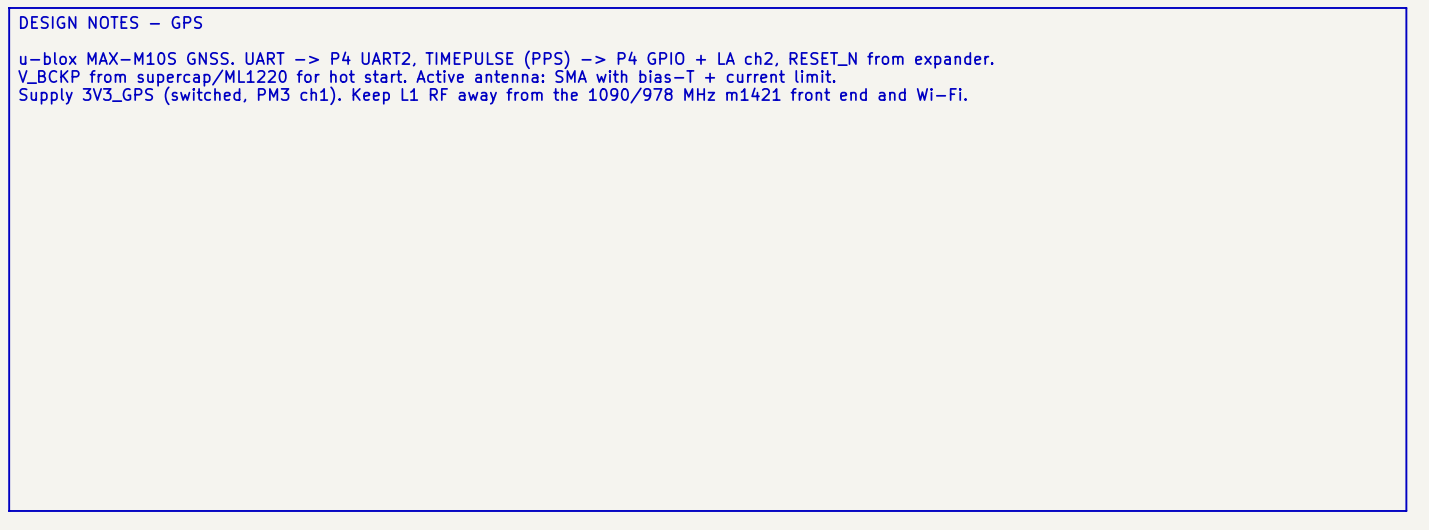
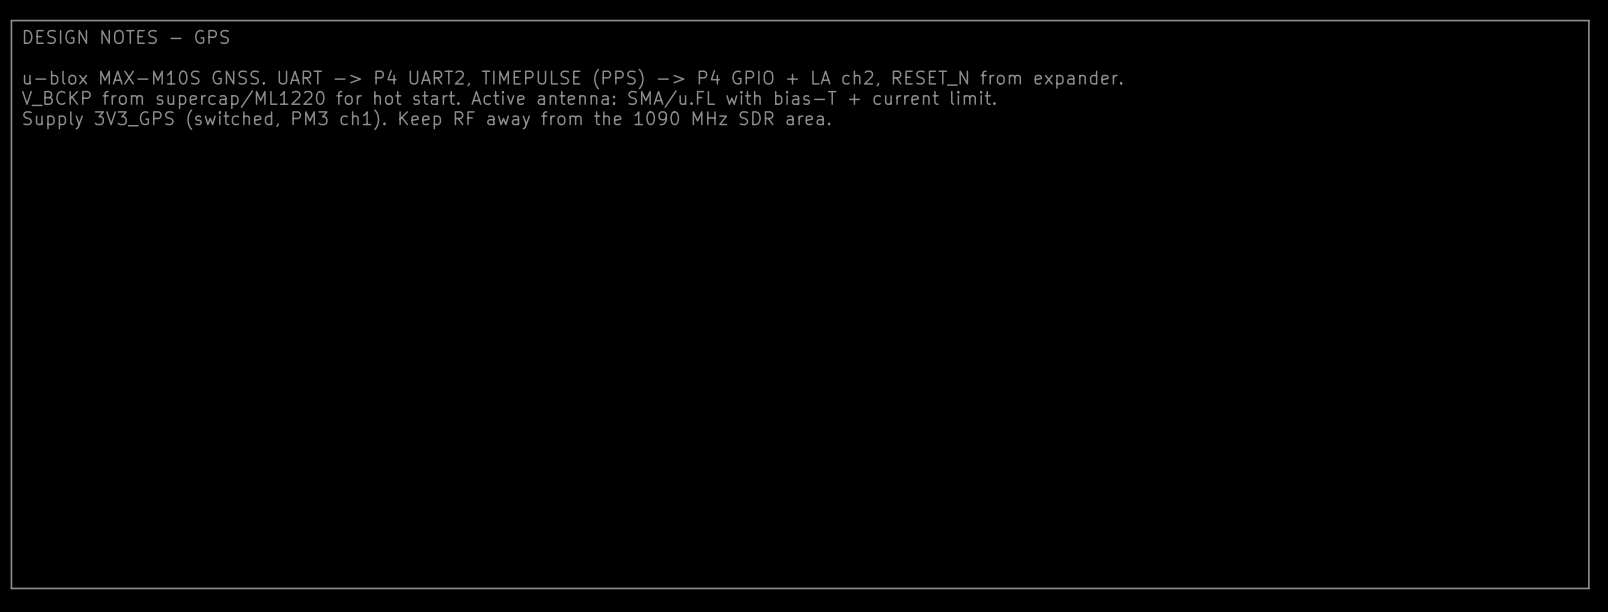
text: V_BCKP from supercap/ML1220 for hot start. Active antenna: SMA with bias-T + current limit. (426, 78) -> V_BCKP from supercap/ML1220 for hot start. Active antenna: SMA/u.FL with bias-T + current limit. (508, 99)
text: Supply 3V3_GPS (switched, PM3 ch1). Keep L1 RF away from the 1090/978 MHz m1421 front end and Wi-Fi. (493, 95) -> Supply 3V3_GPS (switched, PM3 ch1). Keep RF away from the 1090 MHz SDR area. (426, 119)

